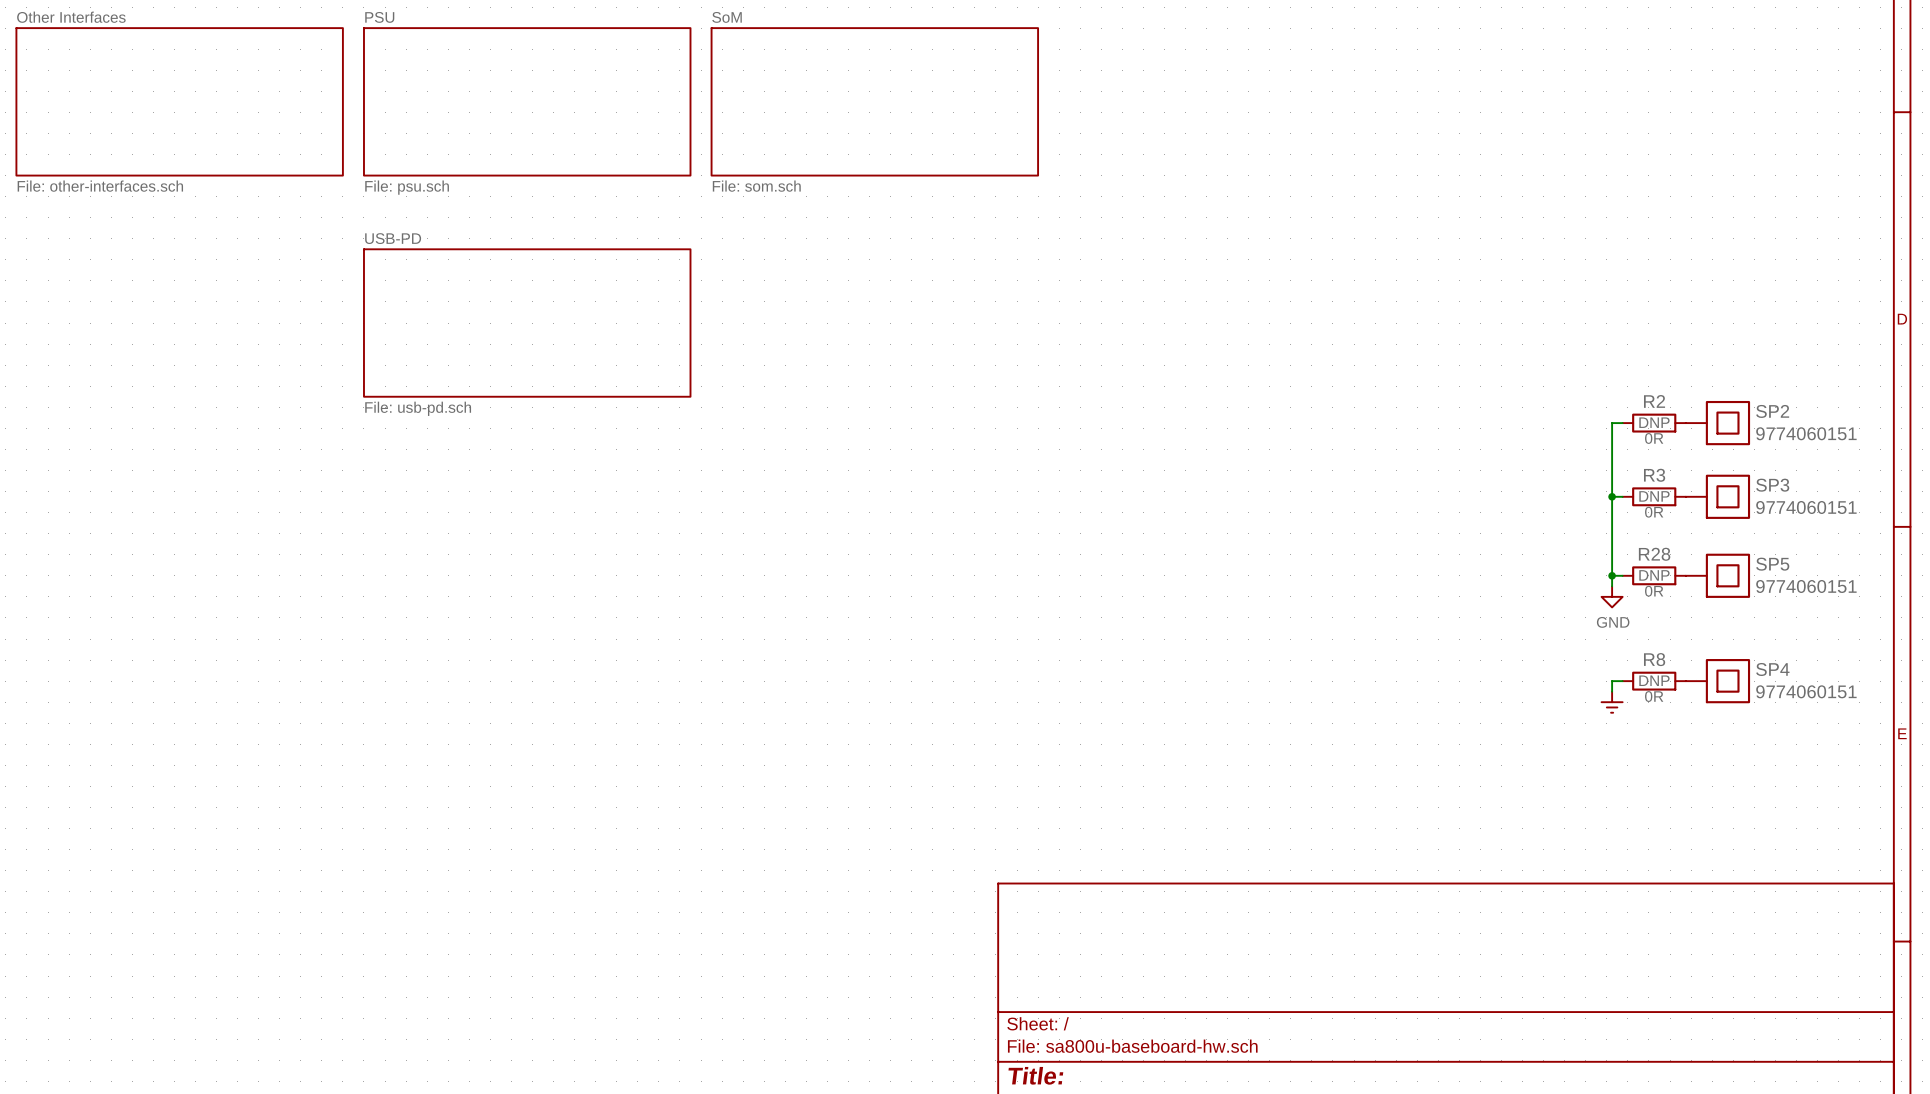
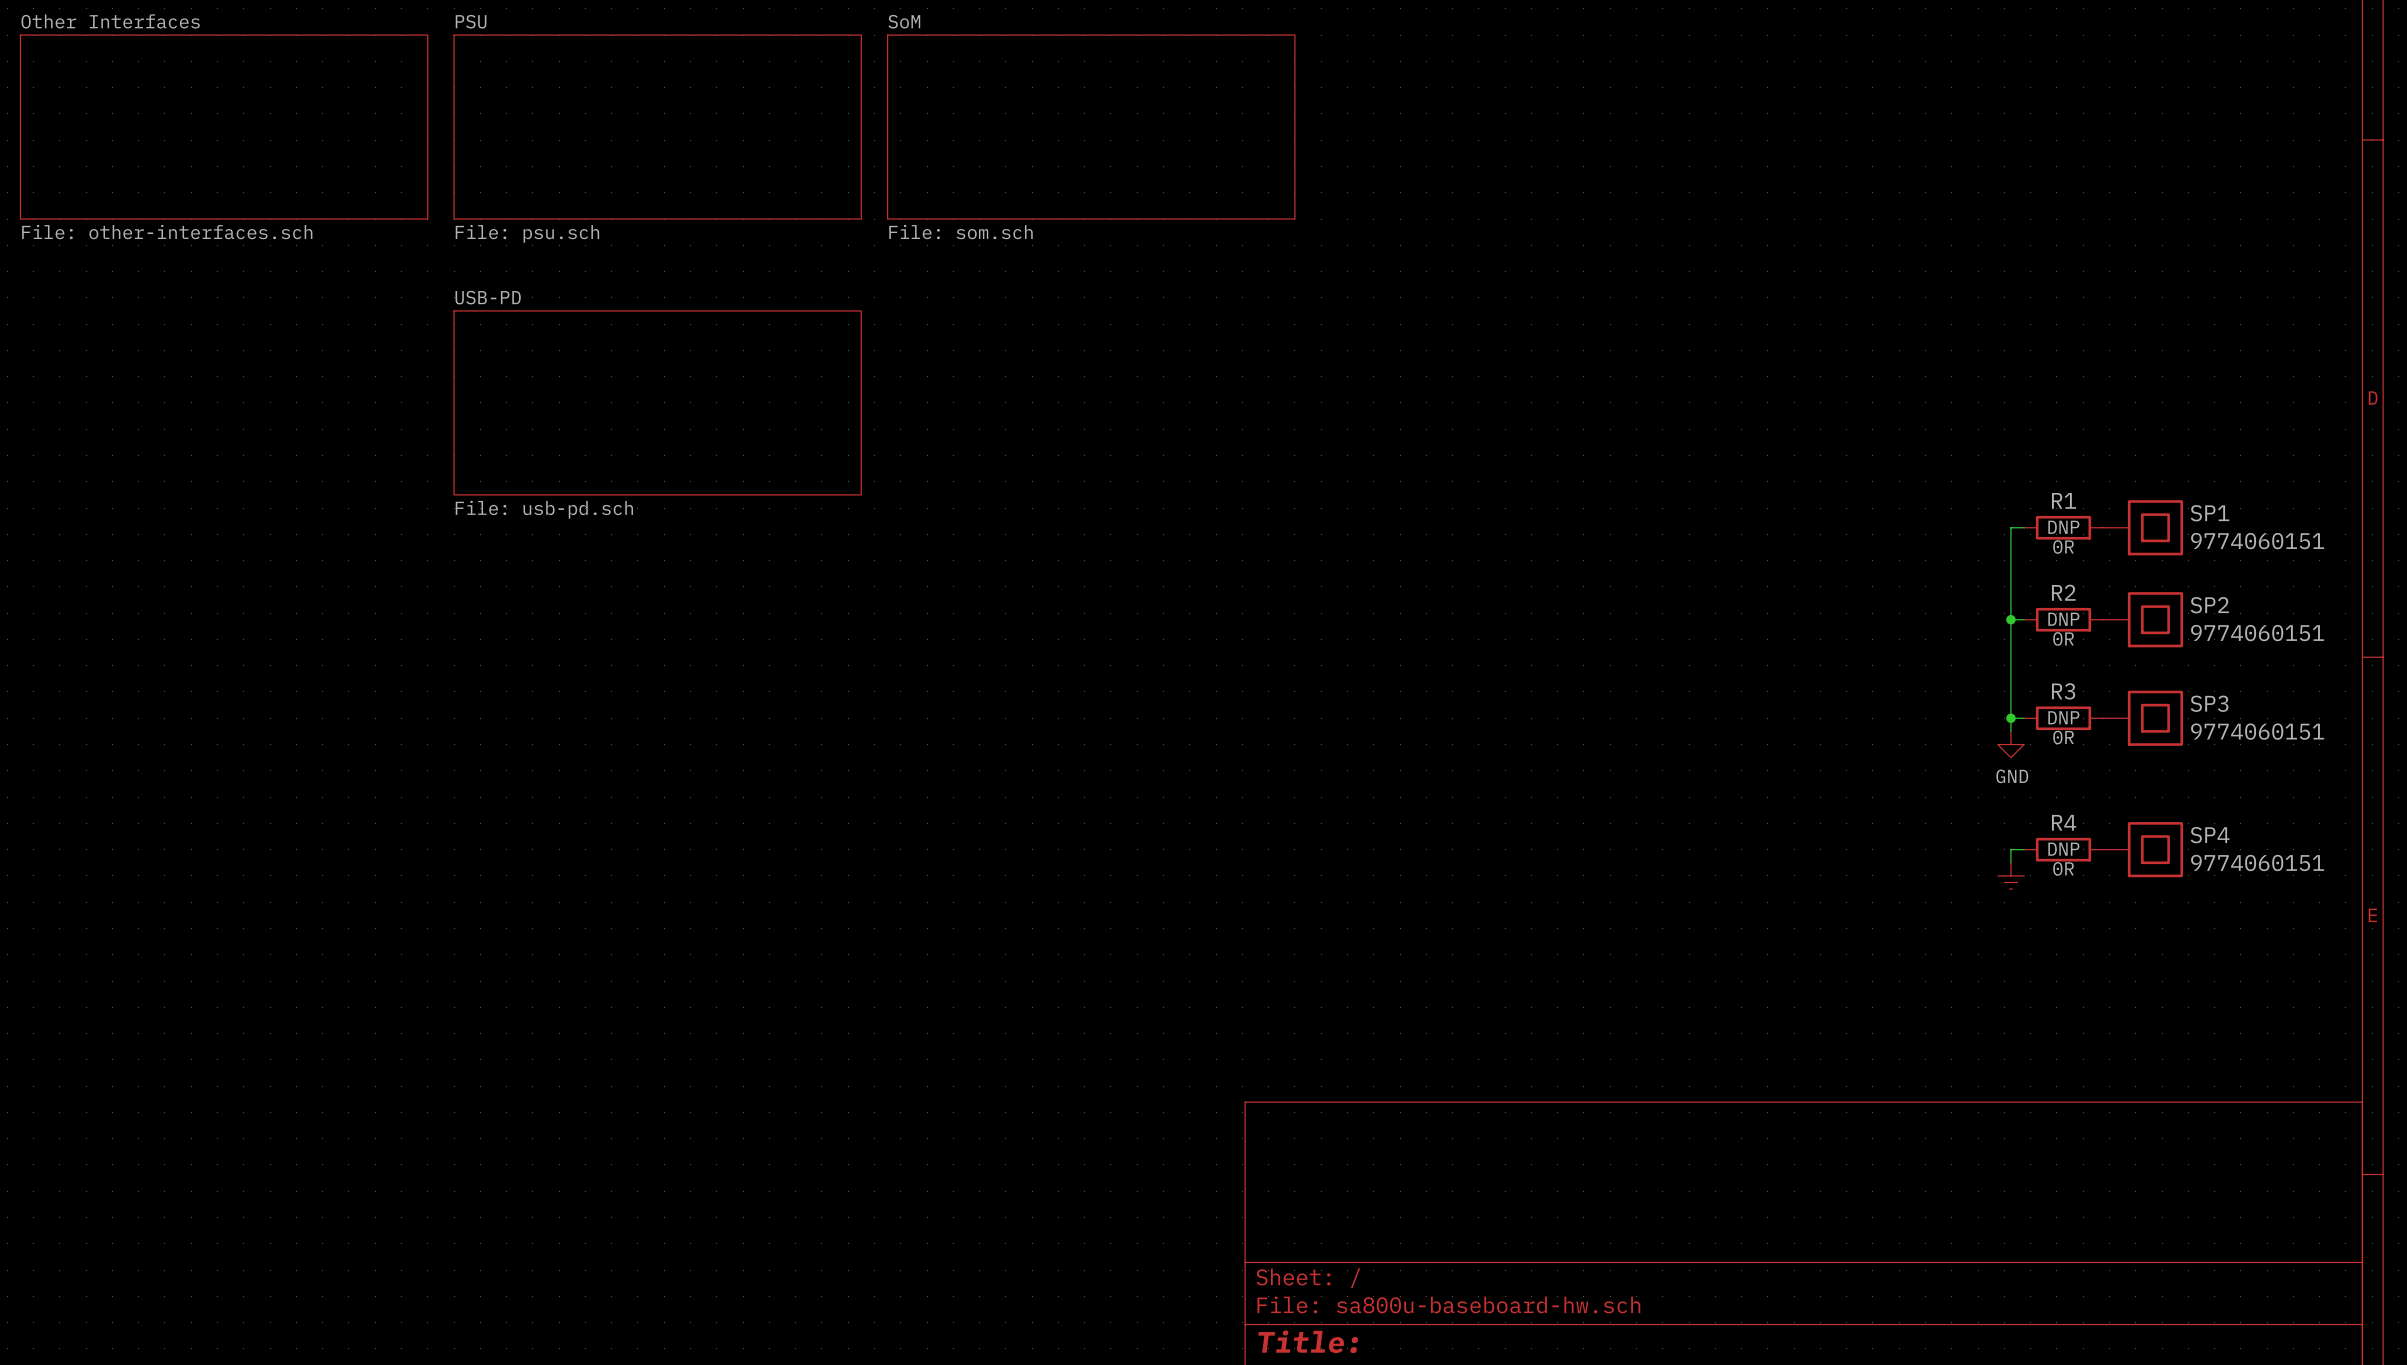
R2 name: R2 (1654, 401) -> R1 (2063, 500)
SP2 name: SP2 (1772, 411) -> SP1 (2209, 513)
R3 name: R3 (1654, 475) -> R2 (2063, 592)
SP3 name: SP3 (1772, 485) -> SP2 (2209, 605)
R28 name: R28 (1654, 554) -> R3 (2063, 691)
SP5 name: SP5 (1772, 564) -> SP3 (2209, 703)
R8 name: R8 (1654, 659) -> R4 (2064, 822)

